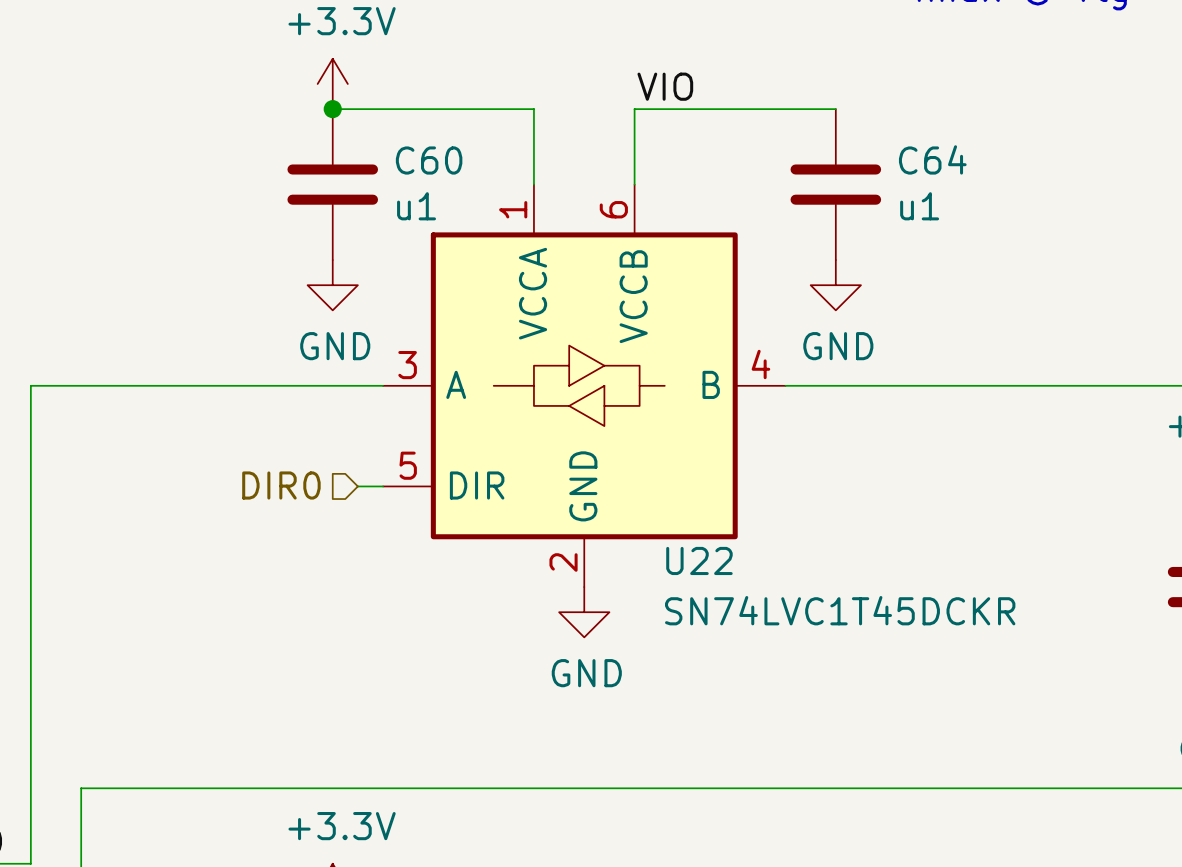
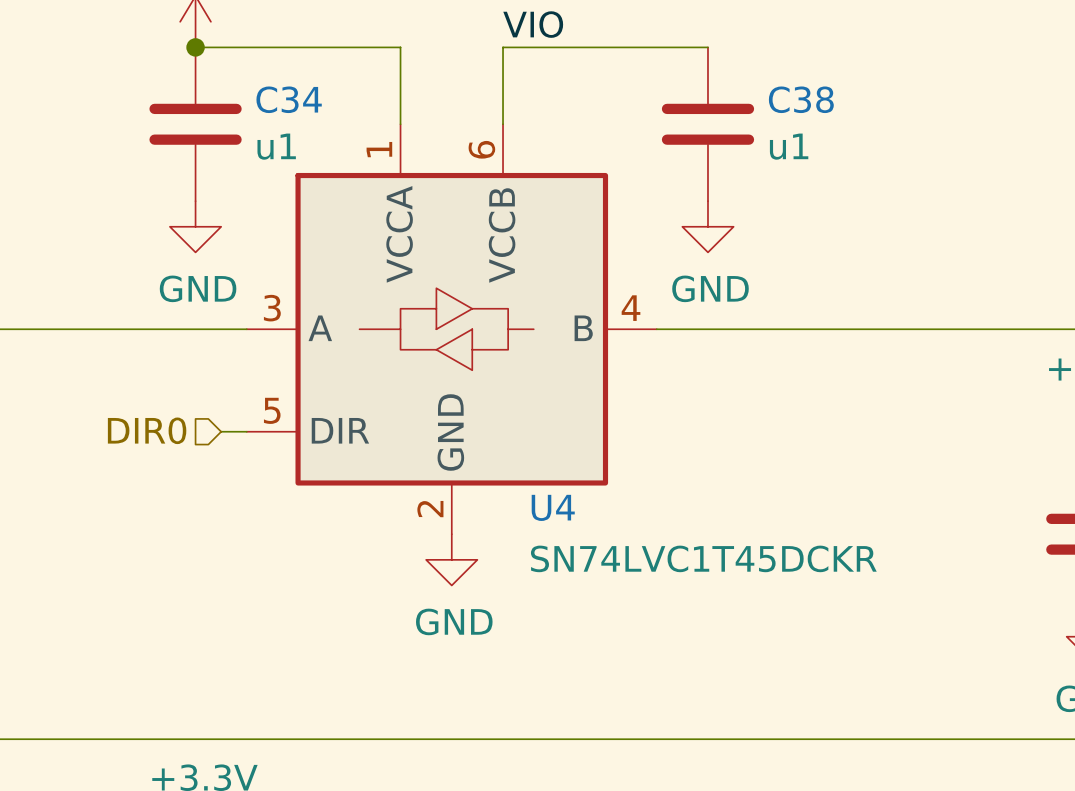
C64 name: C64 (932, 159) -> C38 (801, 99)
C60 name: C60 (429, 160) -> C34 (289, 99)
U22 name: U22 (699, 560) -> U4 (553, 507)

